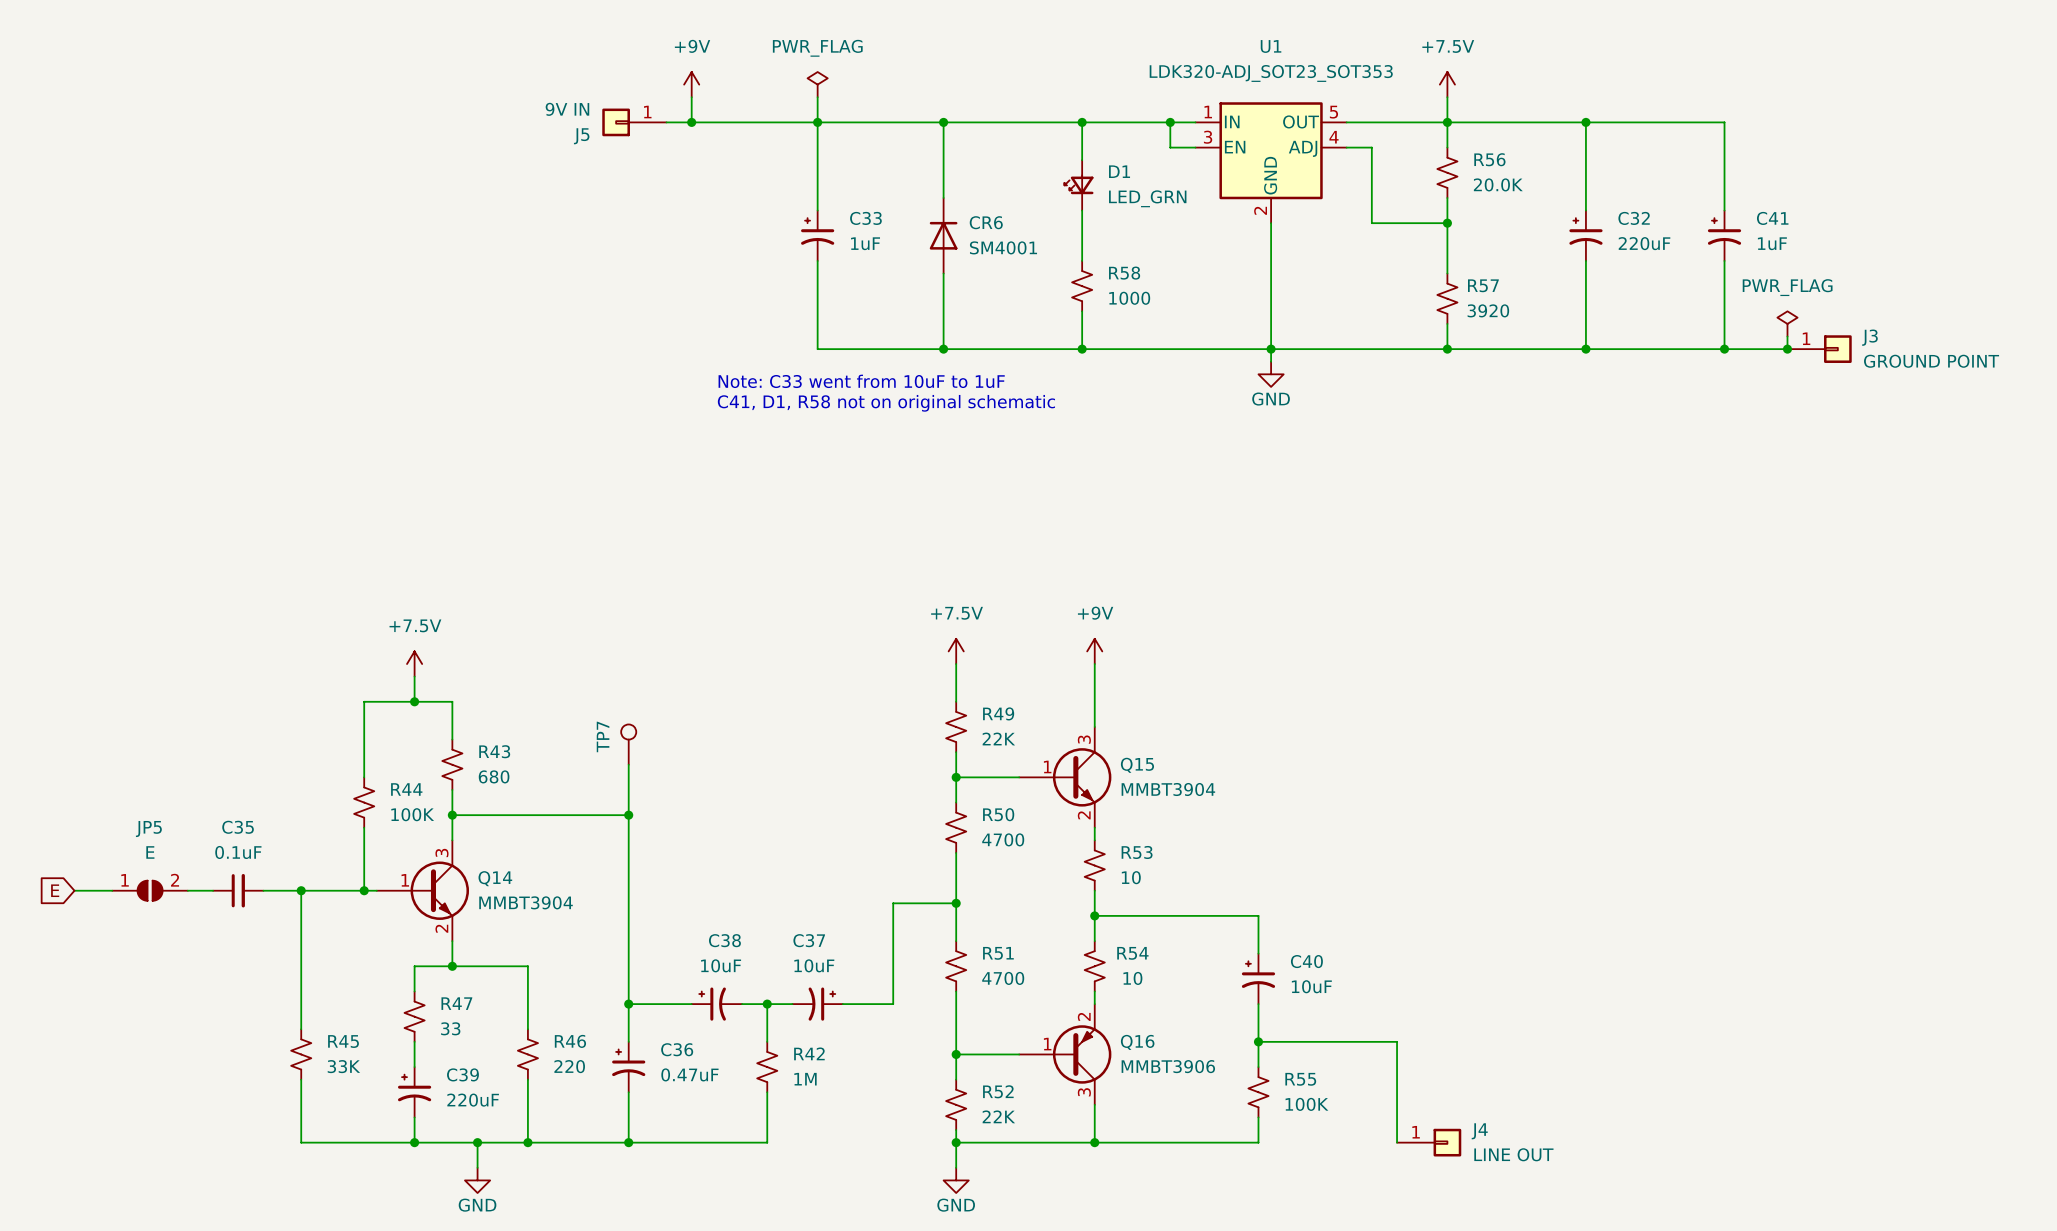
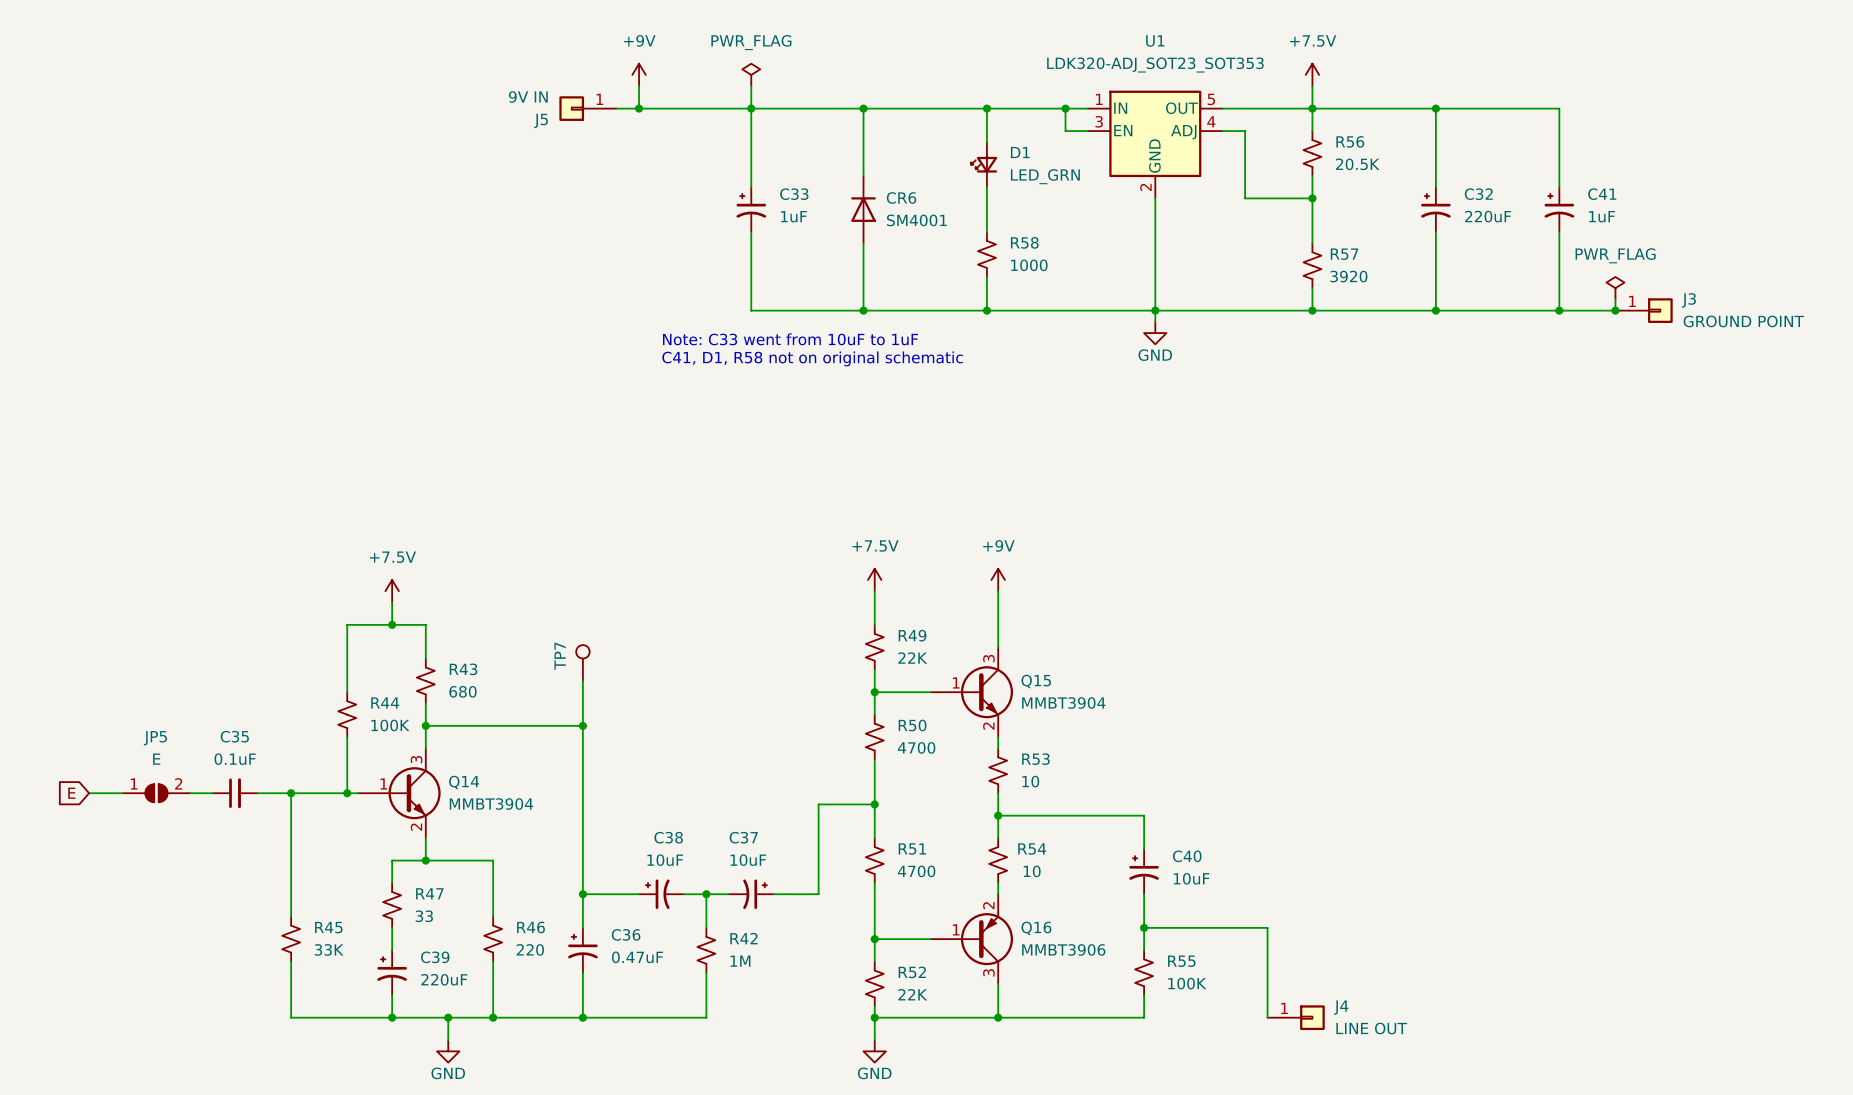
R56 value: 20.0K (1498, 184) -> 20.5K (1357, 164)

